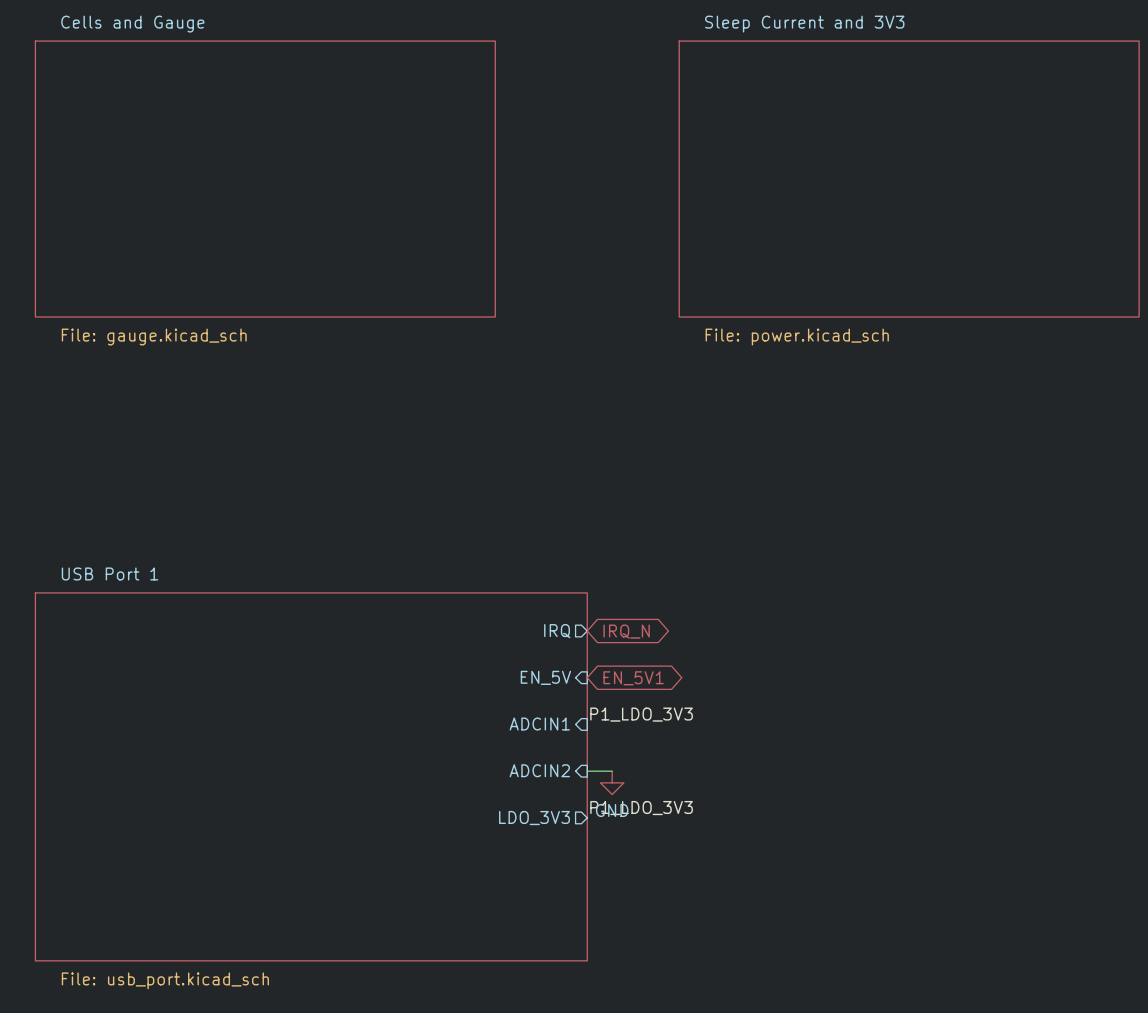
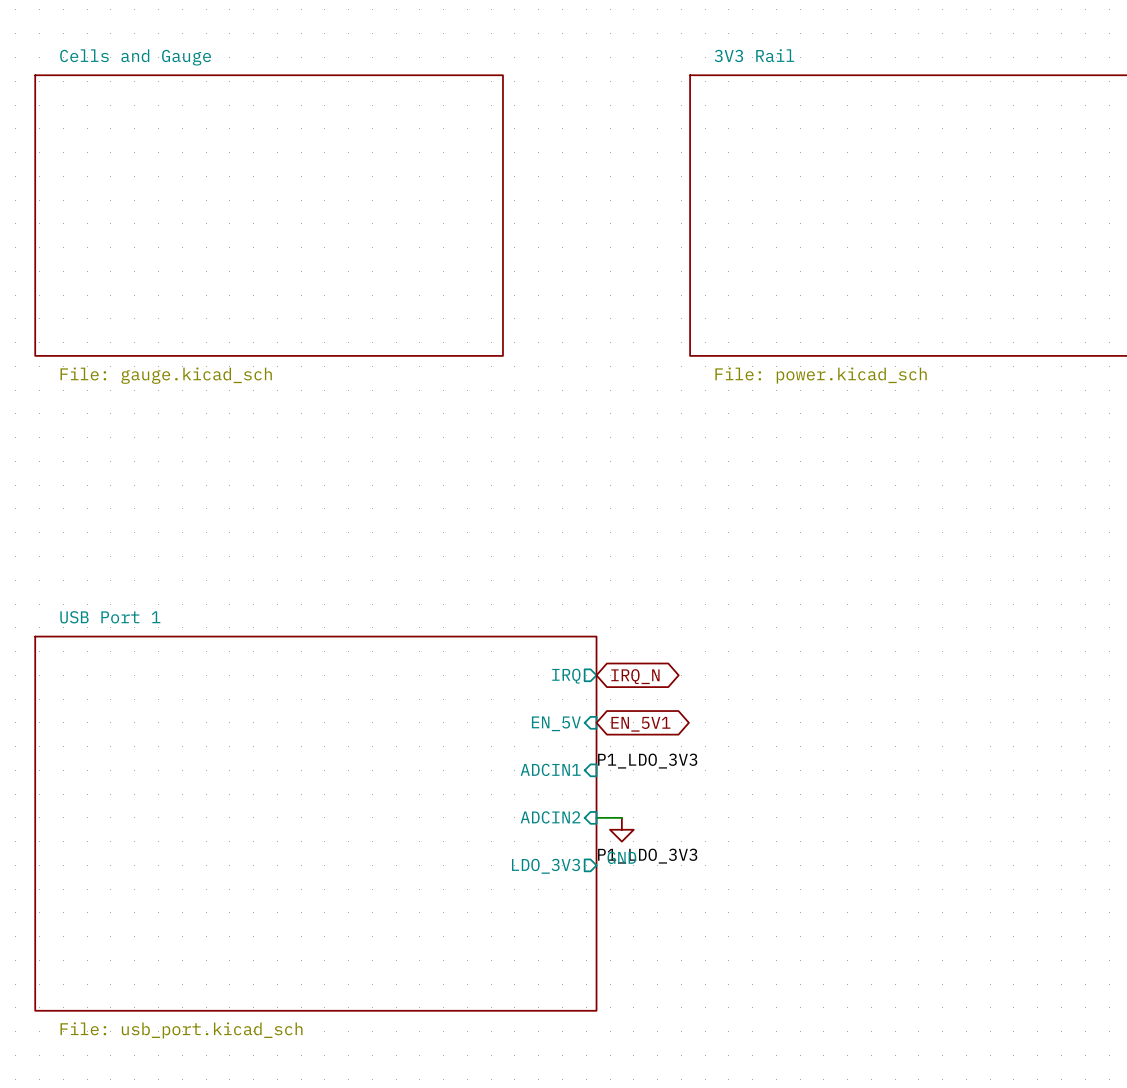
sheet Sleep Current and 3V3 name: Sleep Current and 3V3 (804, 24) -> 3V3 Rail (754, 55)

